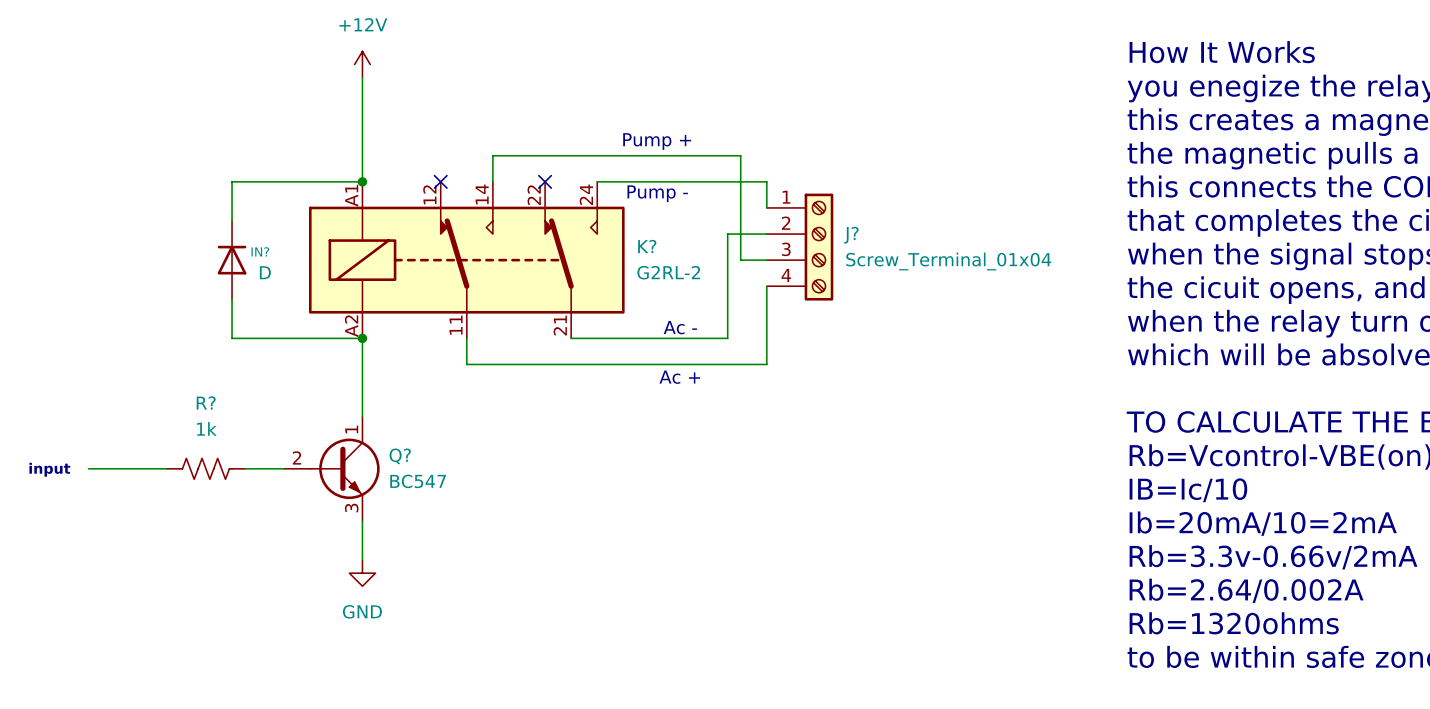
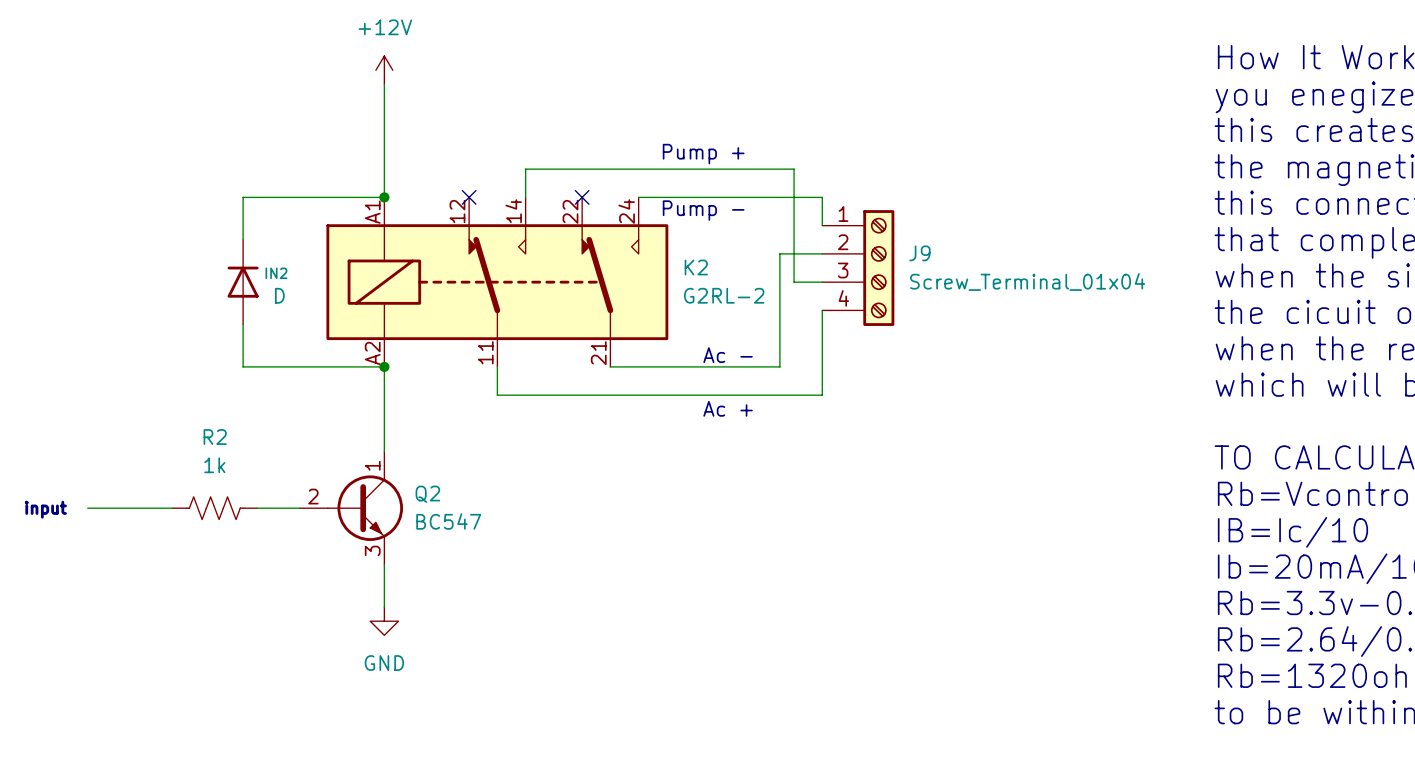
J? name: J? (851, 235) -> J9 (919, 253)
K? name: K? (647, 246) -> K2 (696, 267)
IN? name: IN? (260, 251) -> IN2 (276, 273)
R? name: R? (206, 403) -> R2 (215, 437)
Q? name: Q? (400, 456) -> Q2 (427, 494)

